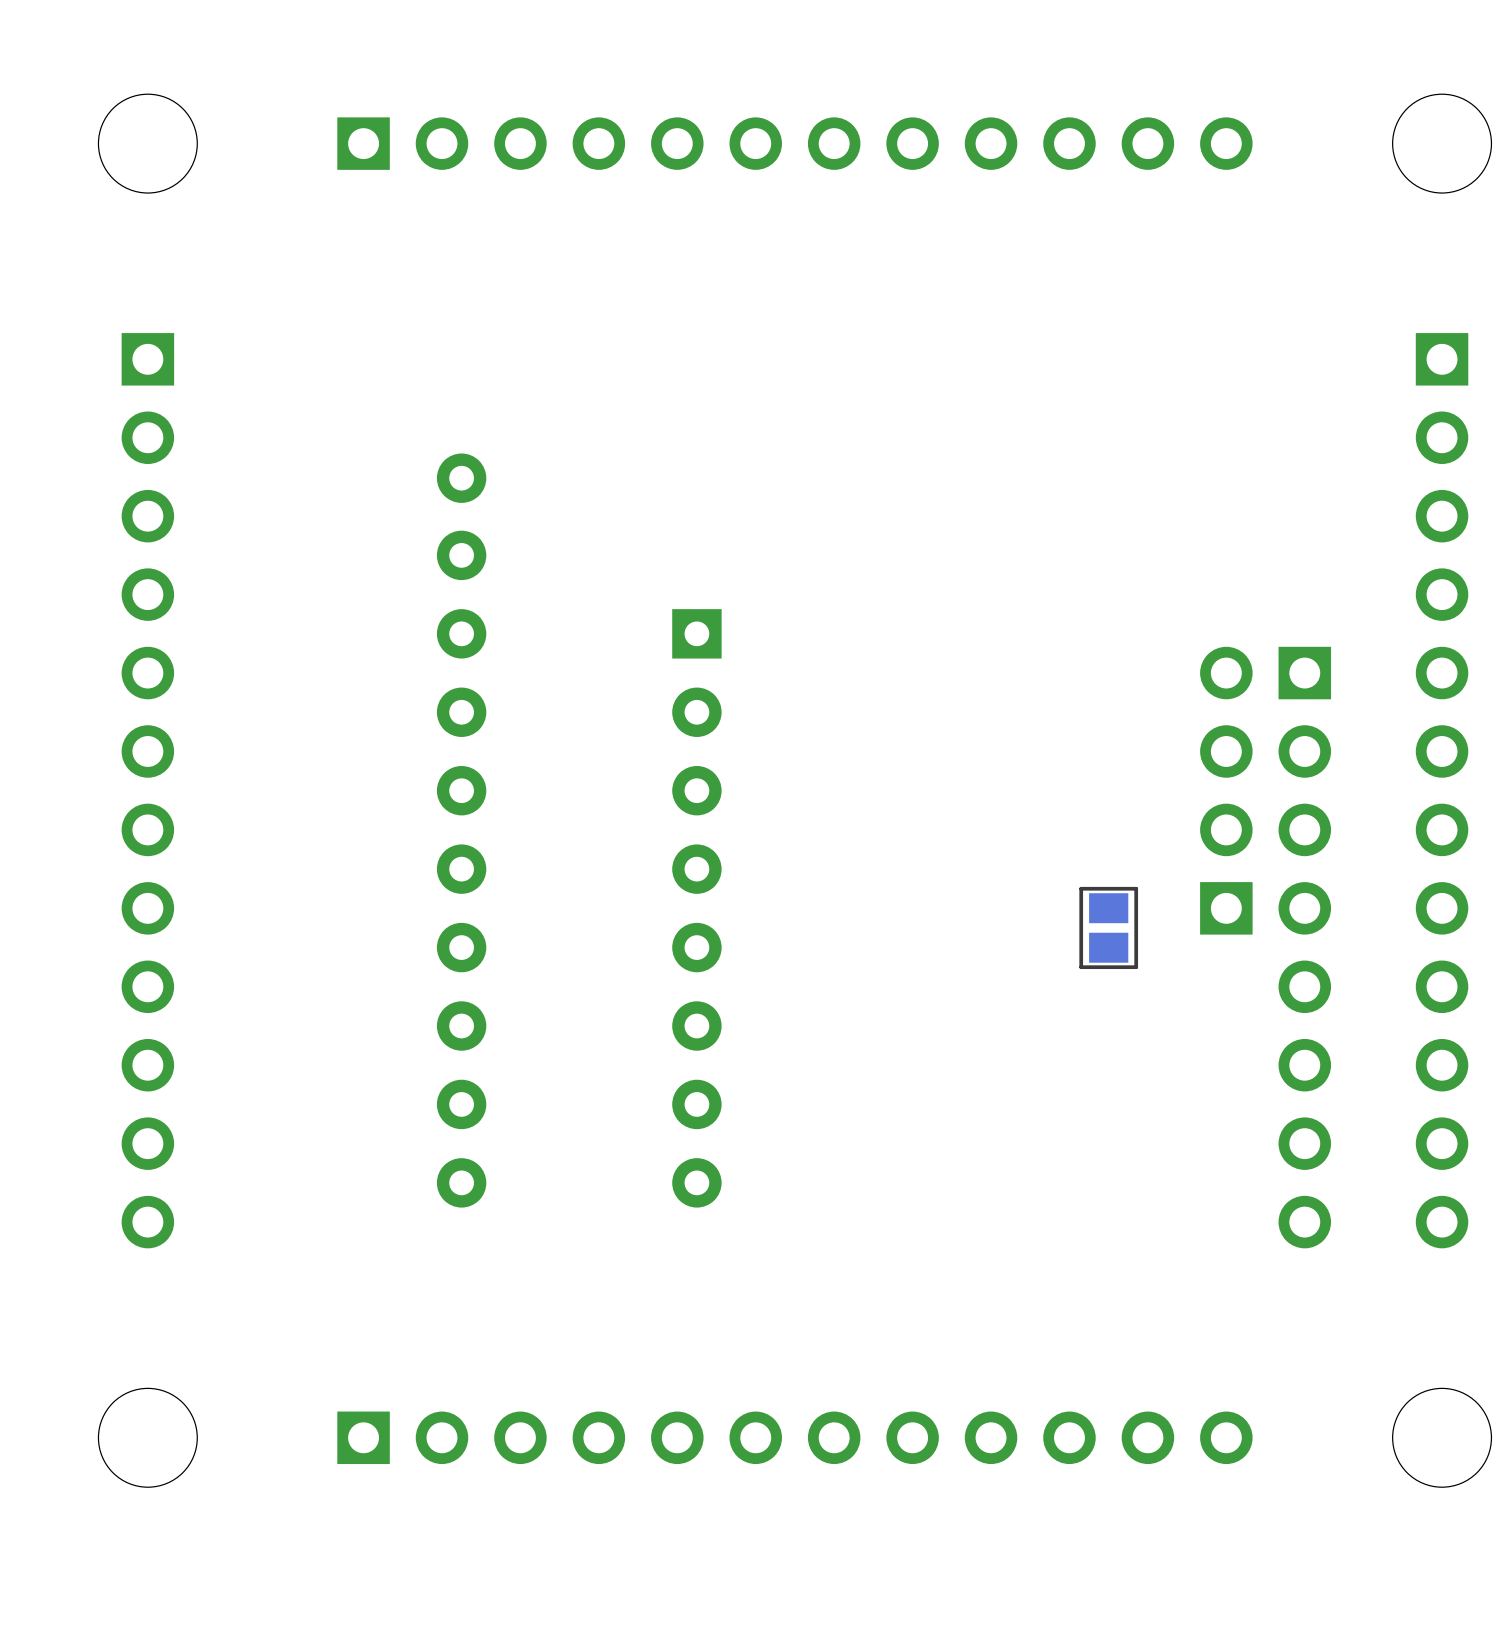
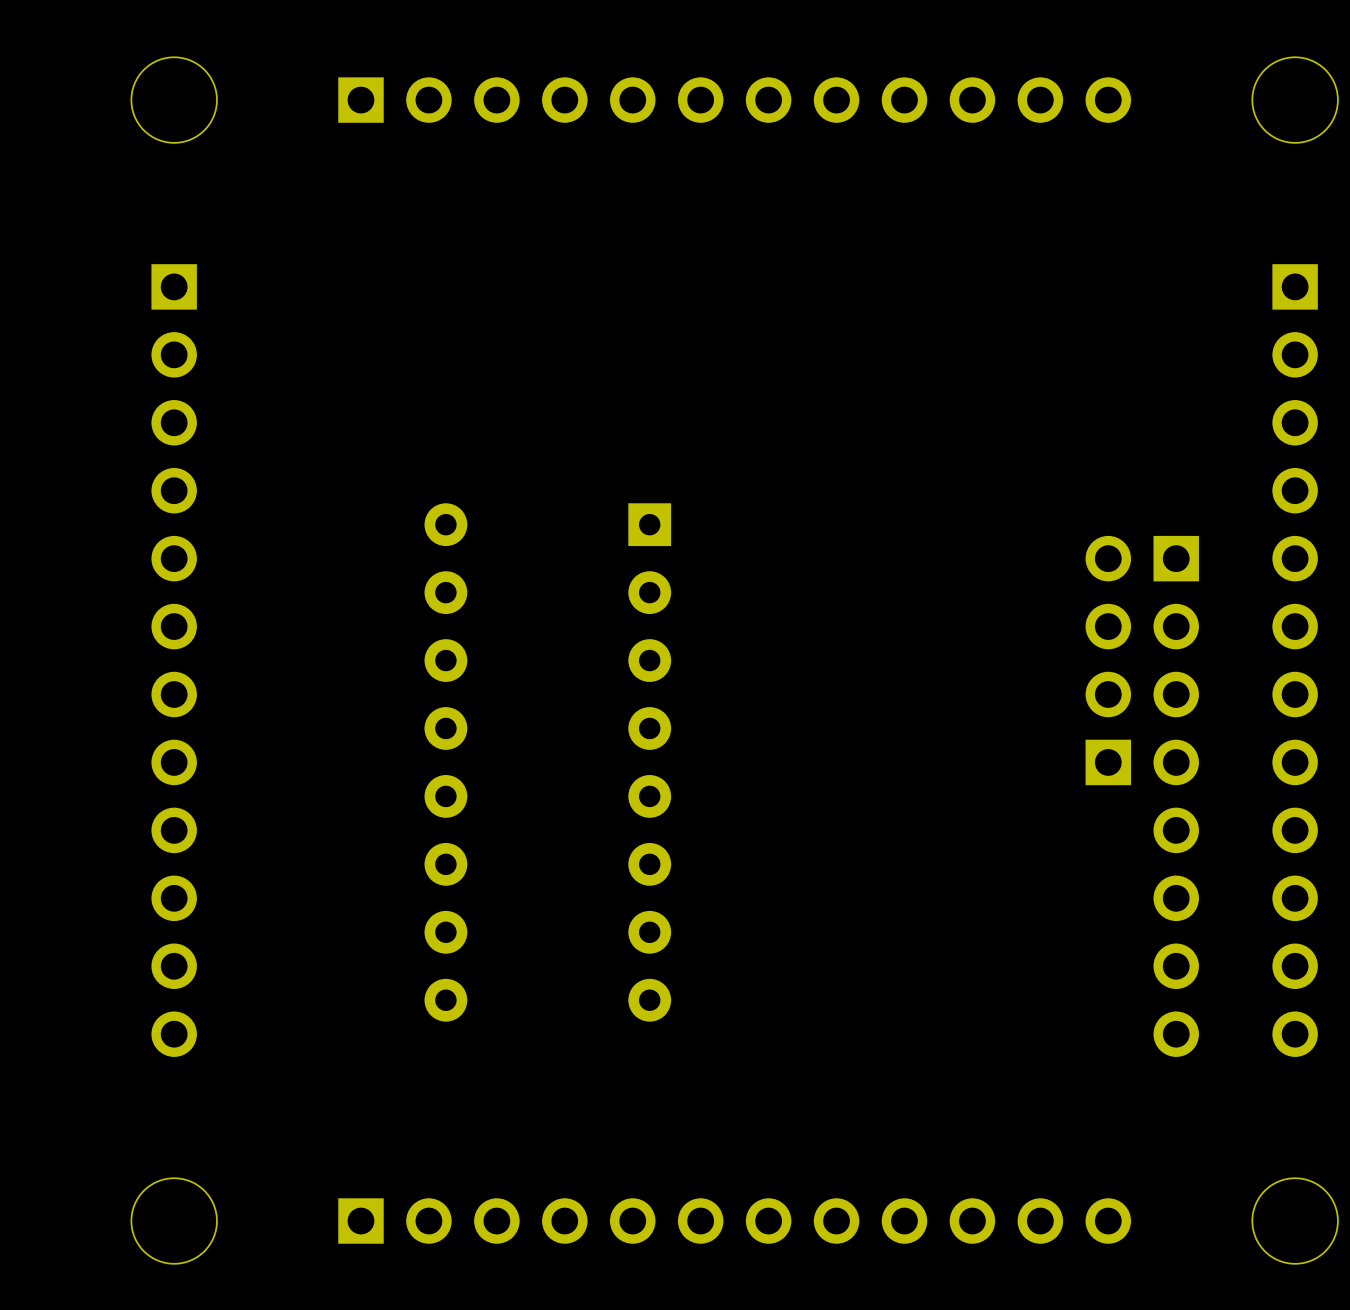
part: (461, 516) -> none
part: (1108, 927) -> none

